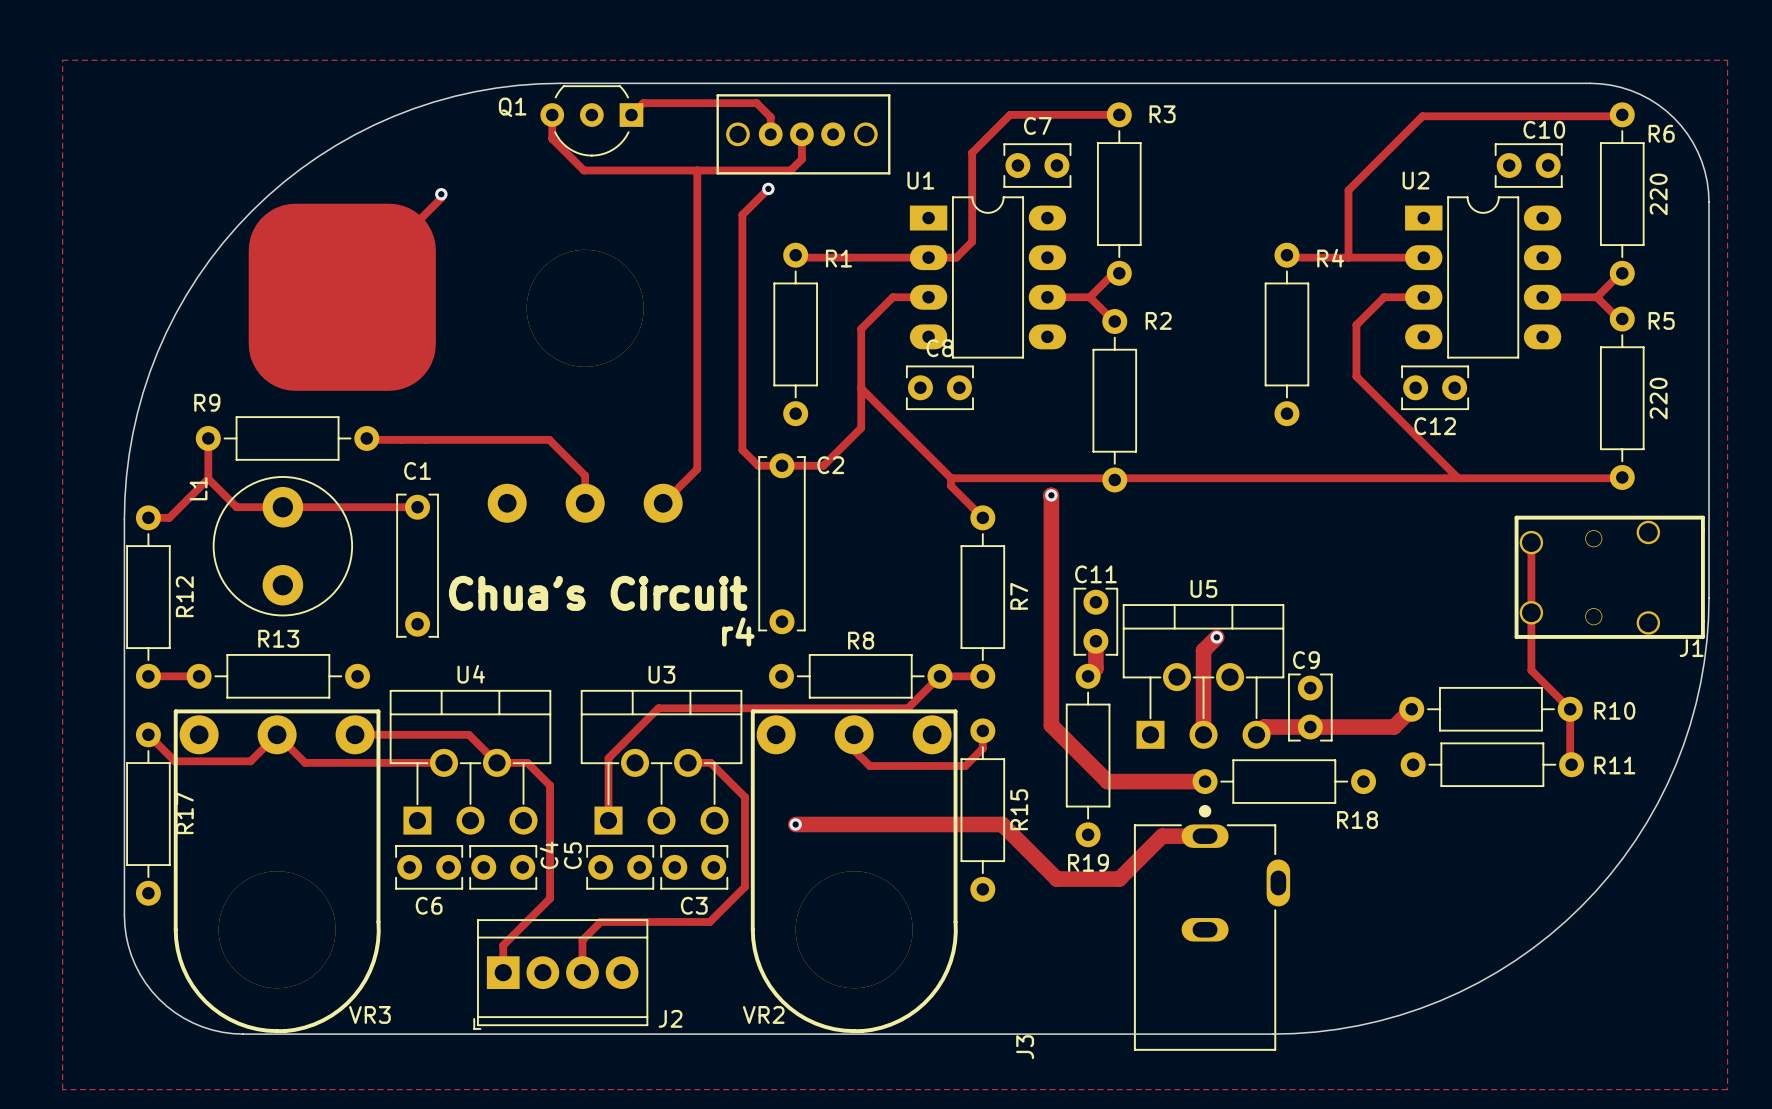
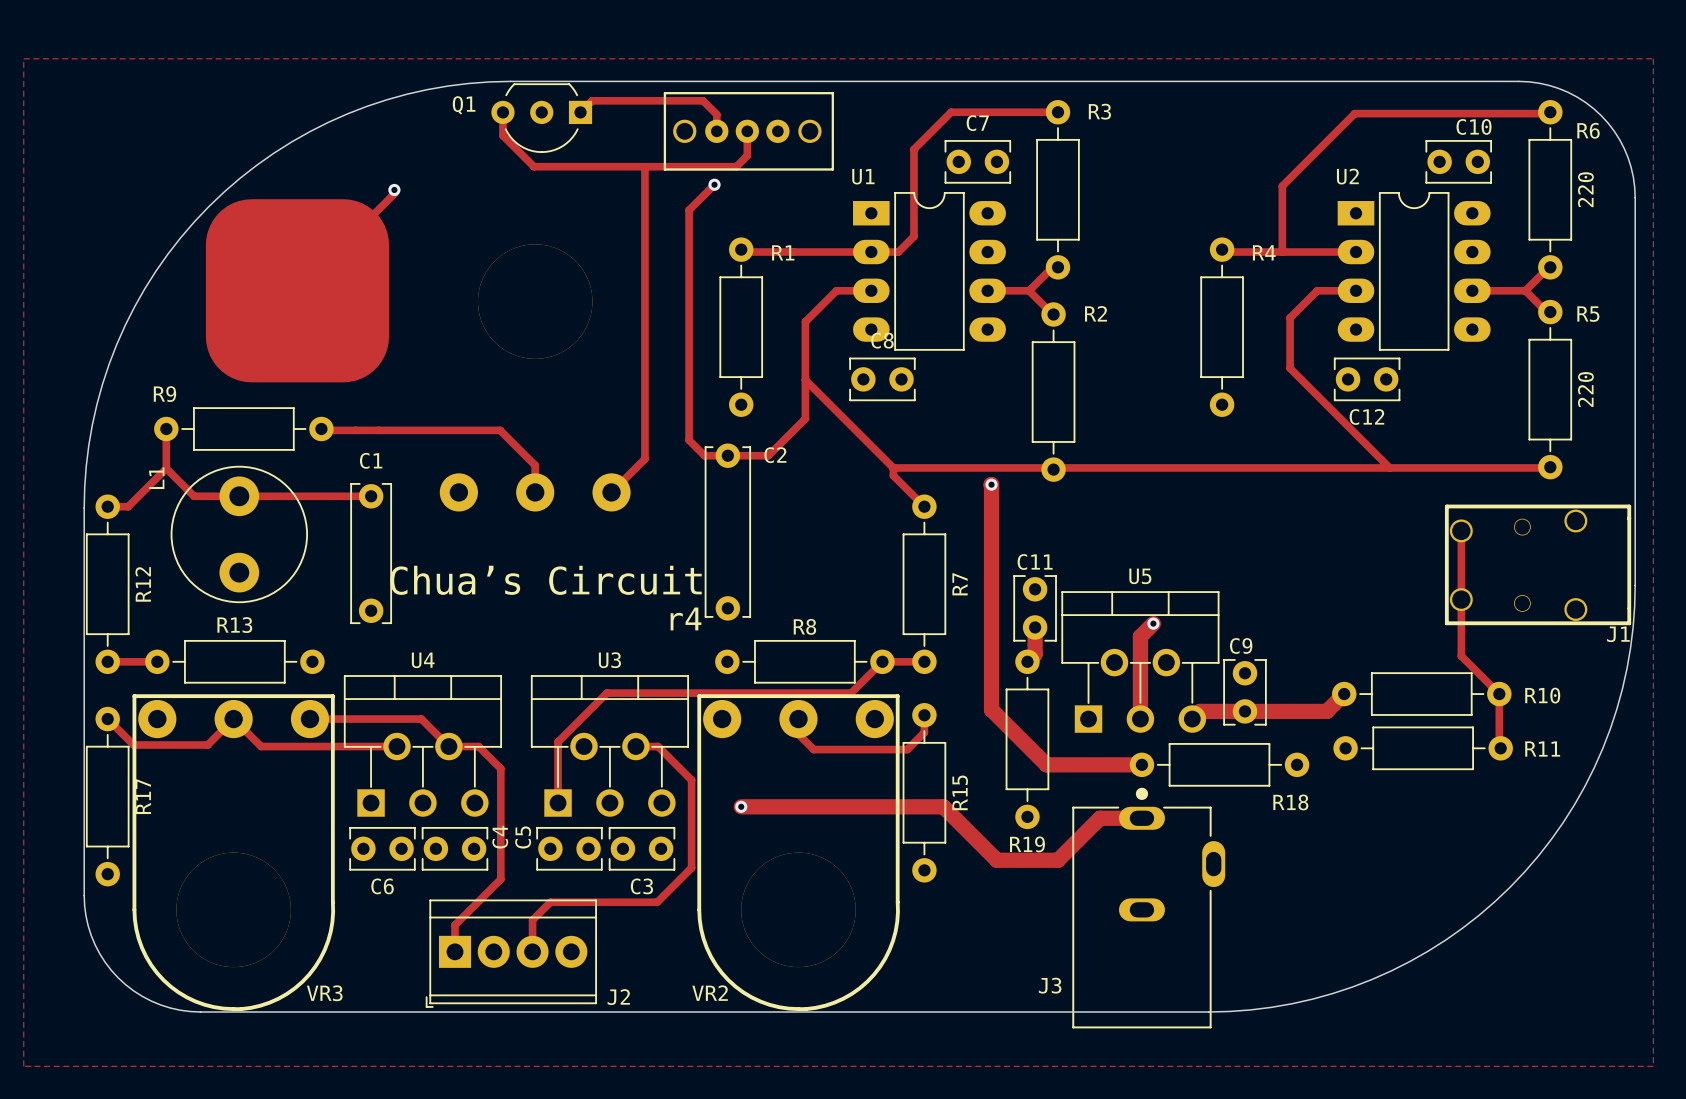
J3 name rotation: 0° (1025, 1047) -> 90° clockwise (1050, 985)
J3 name position: J3 (1025, 1047) -> J3 (1050, 985)

